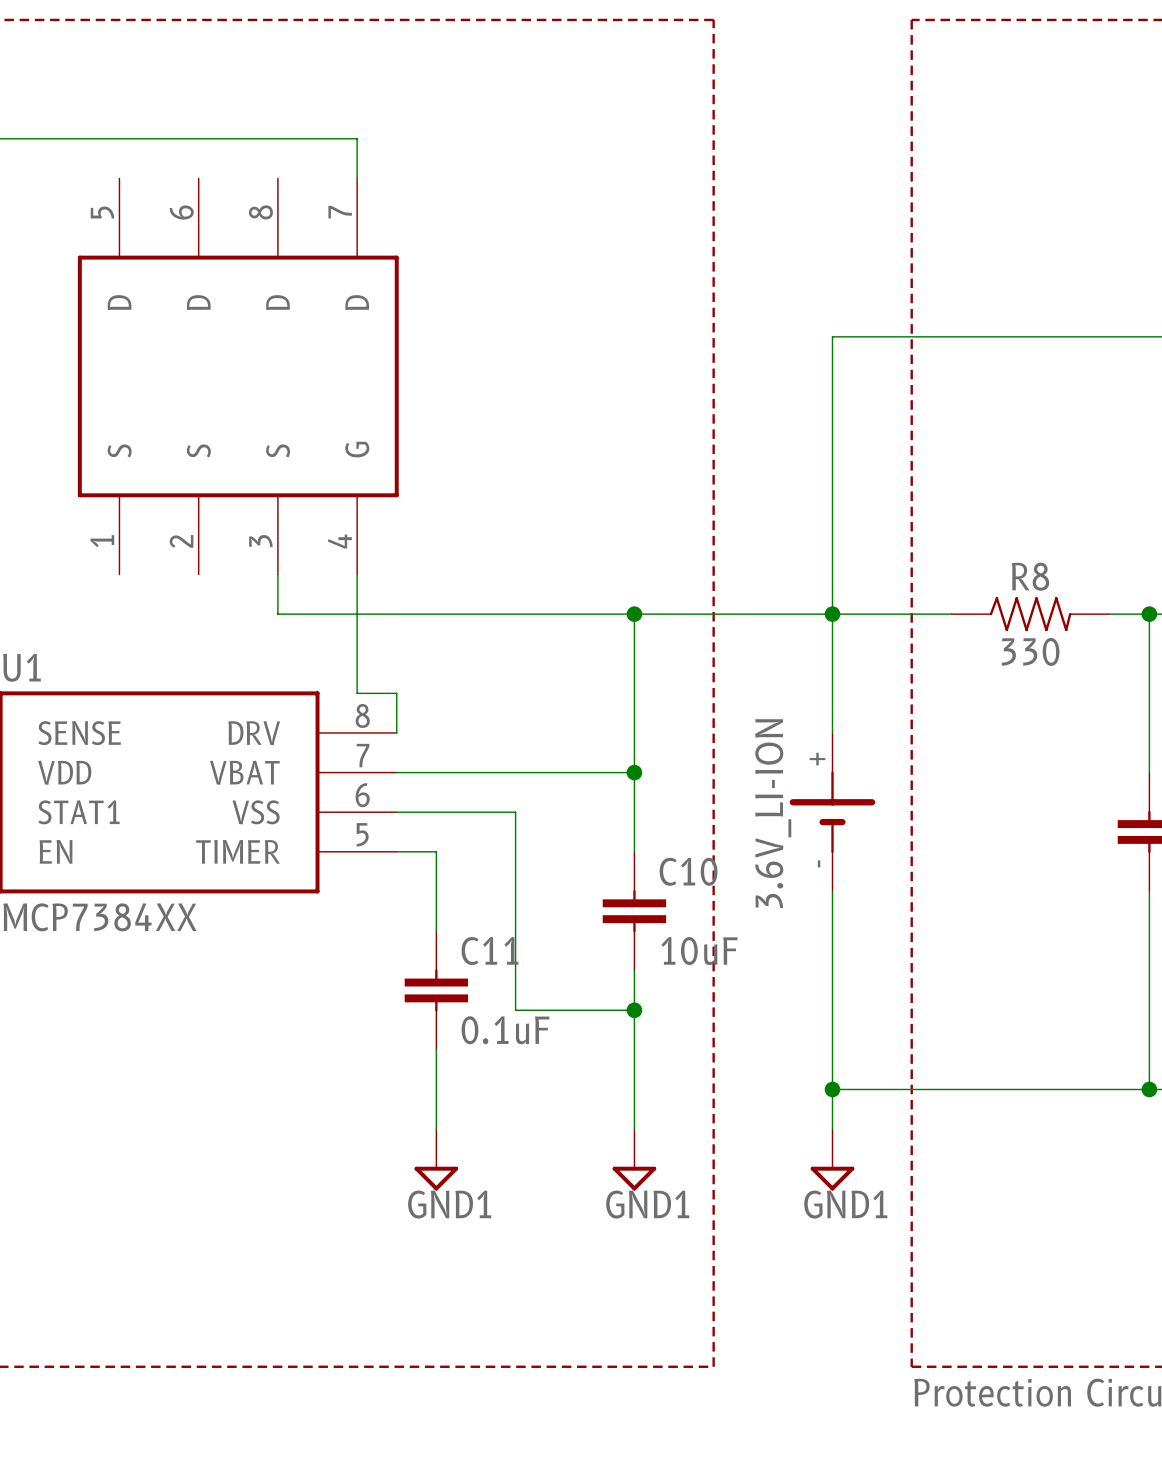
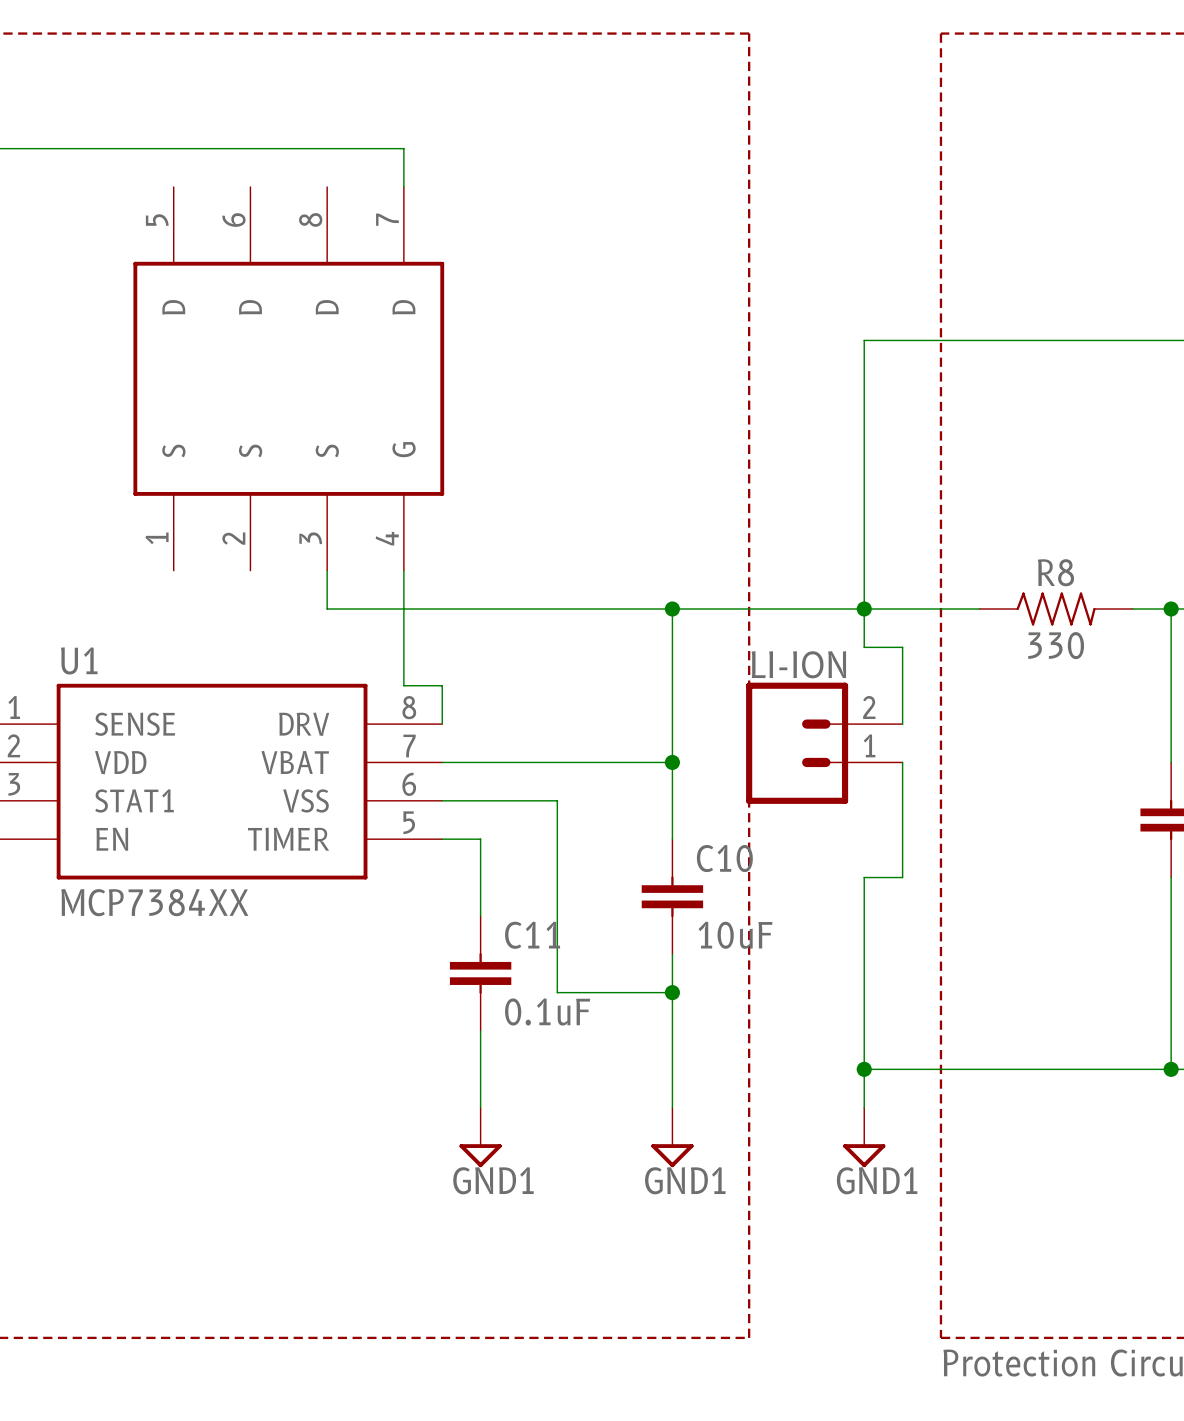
wire: (832, 653) (832, 732) -> (864, 647) (902, 647) (902, 724)
LI-ION: none -> (824, 743)
wire: none -> (902, 762) (902, 877) (864, 877)
3.6V_LI-ION: (832, 812) -> none

